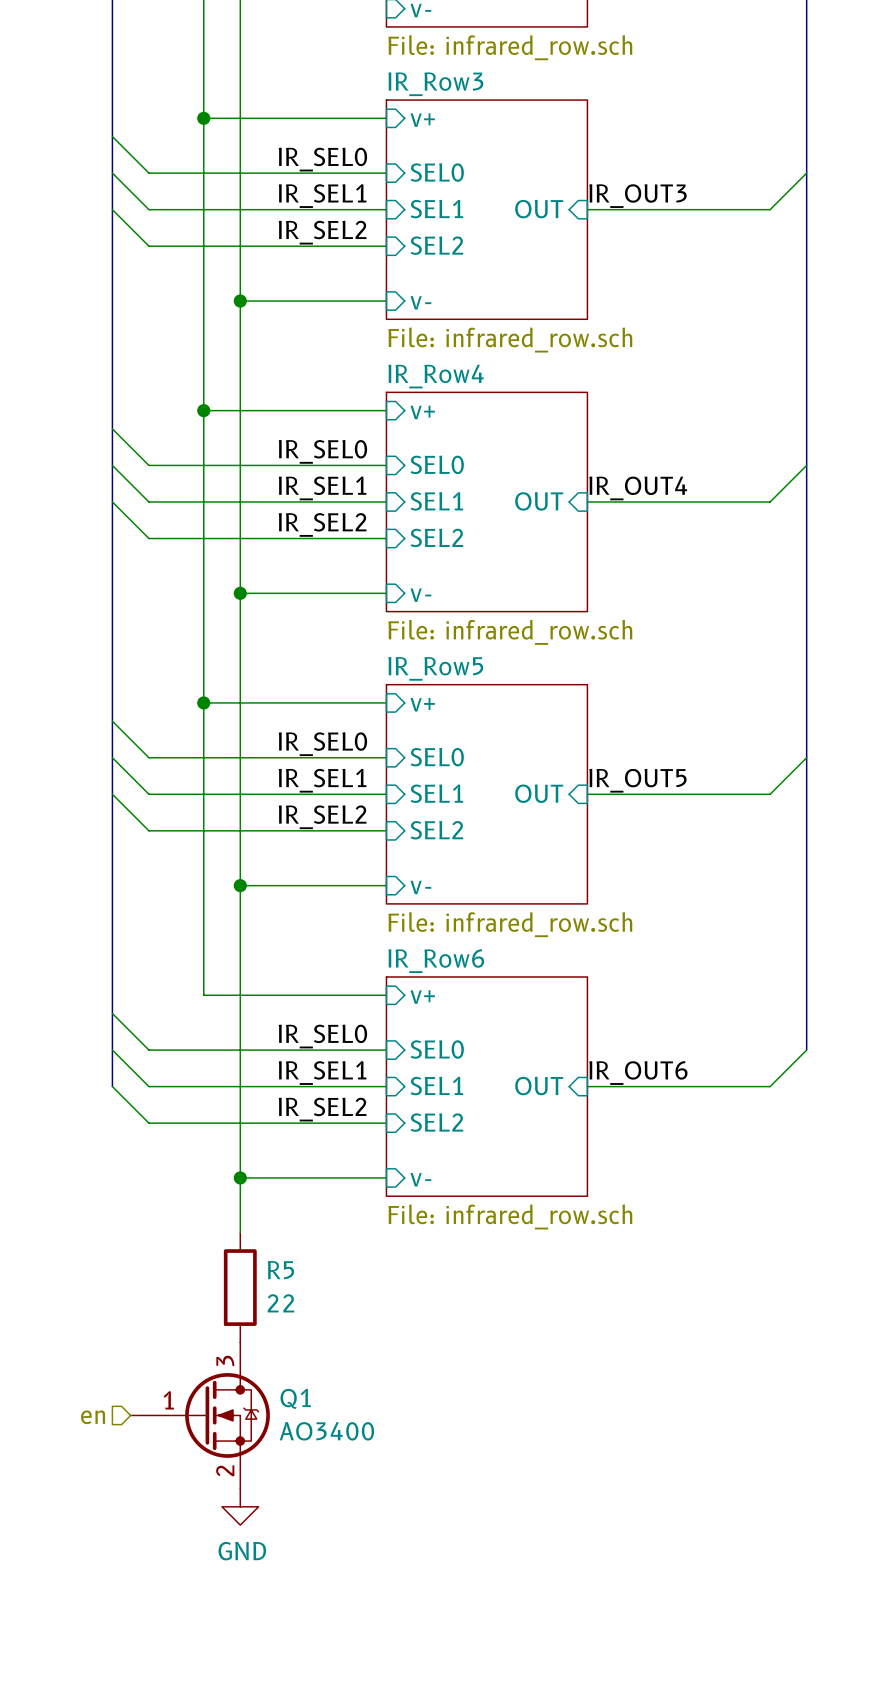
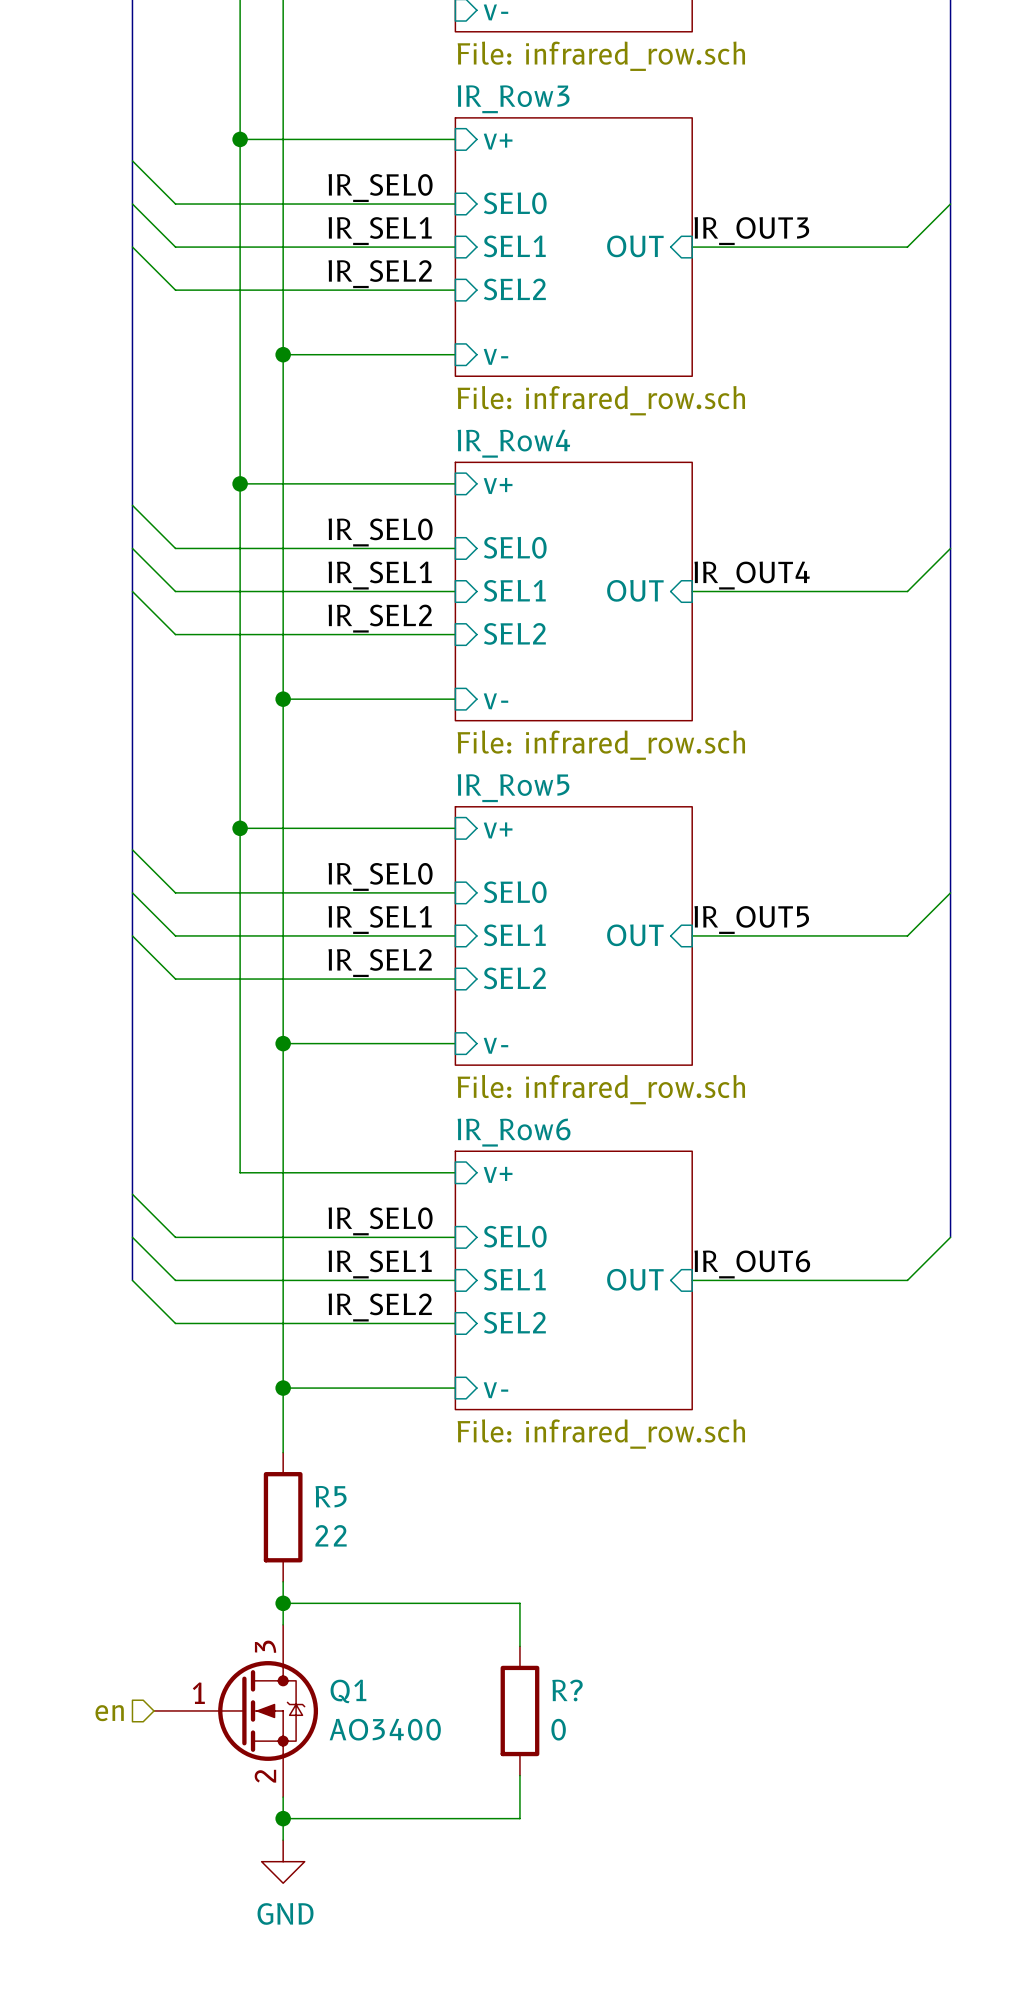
wire: none -> (283, 1603) (519, 1603) (519, 1646)
junction: none -> (283, 1603)
Q1 position: (200, 1415) -> (236, 1710)
hierarchical label position: en (93, 1417) -> en (109, 1713)
R?: none -> 0 (519, 1710)
power symbol position: GND (240, 1506) -> GND (283, 1861)
wire: none -> (519, 1775) (519, 1818) (283, 1818)
wire: none -> (283, 1797) (283, 1840)
junction: none -> (283, 1818)

